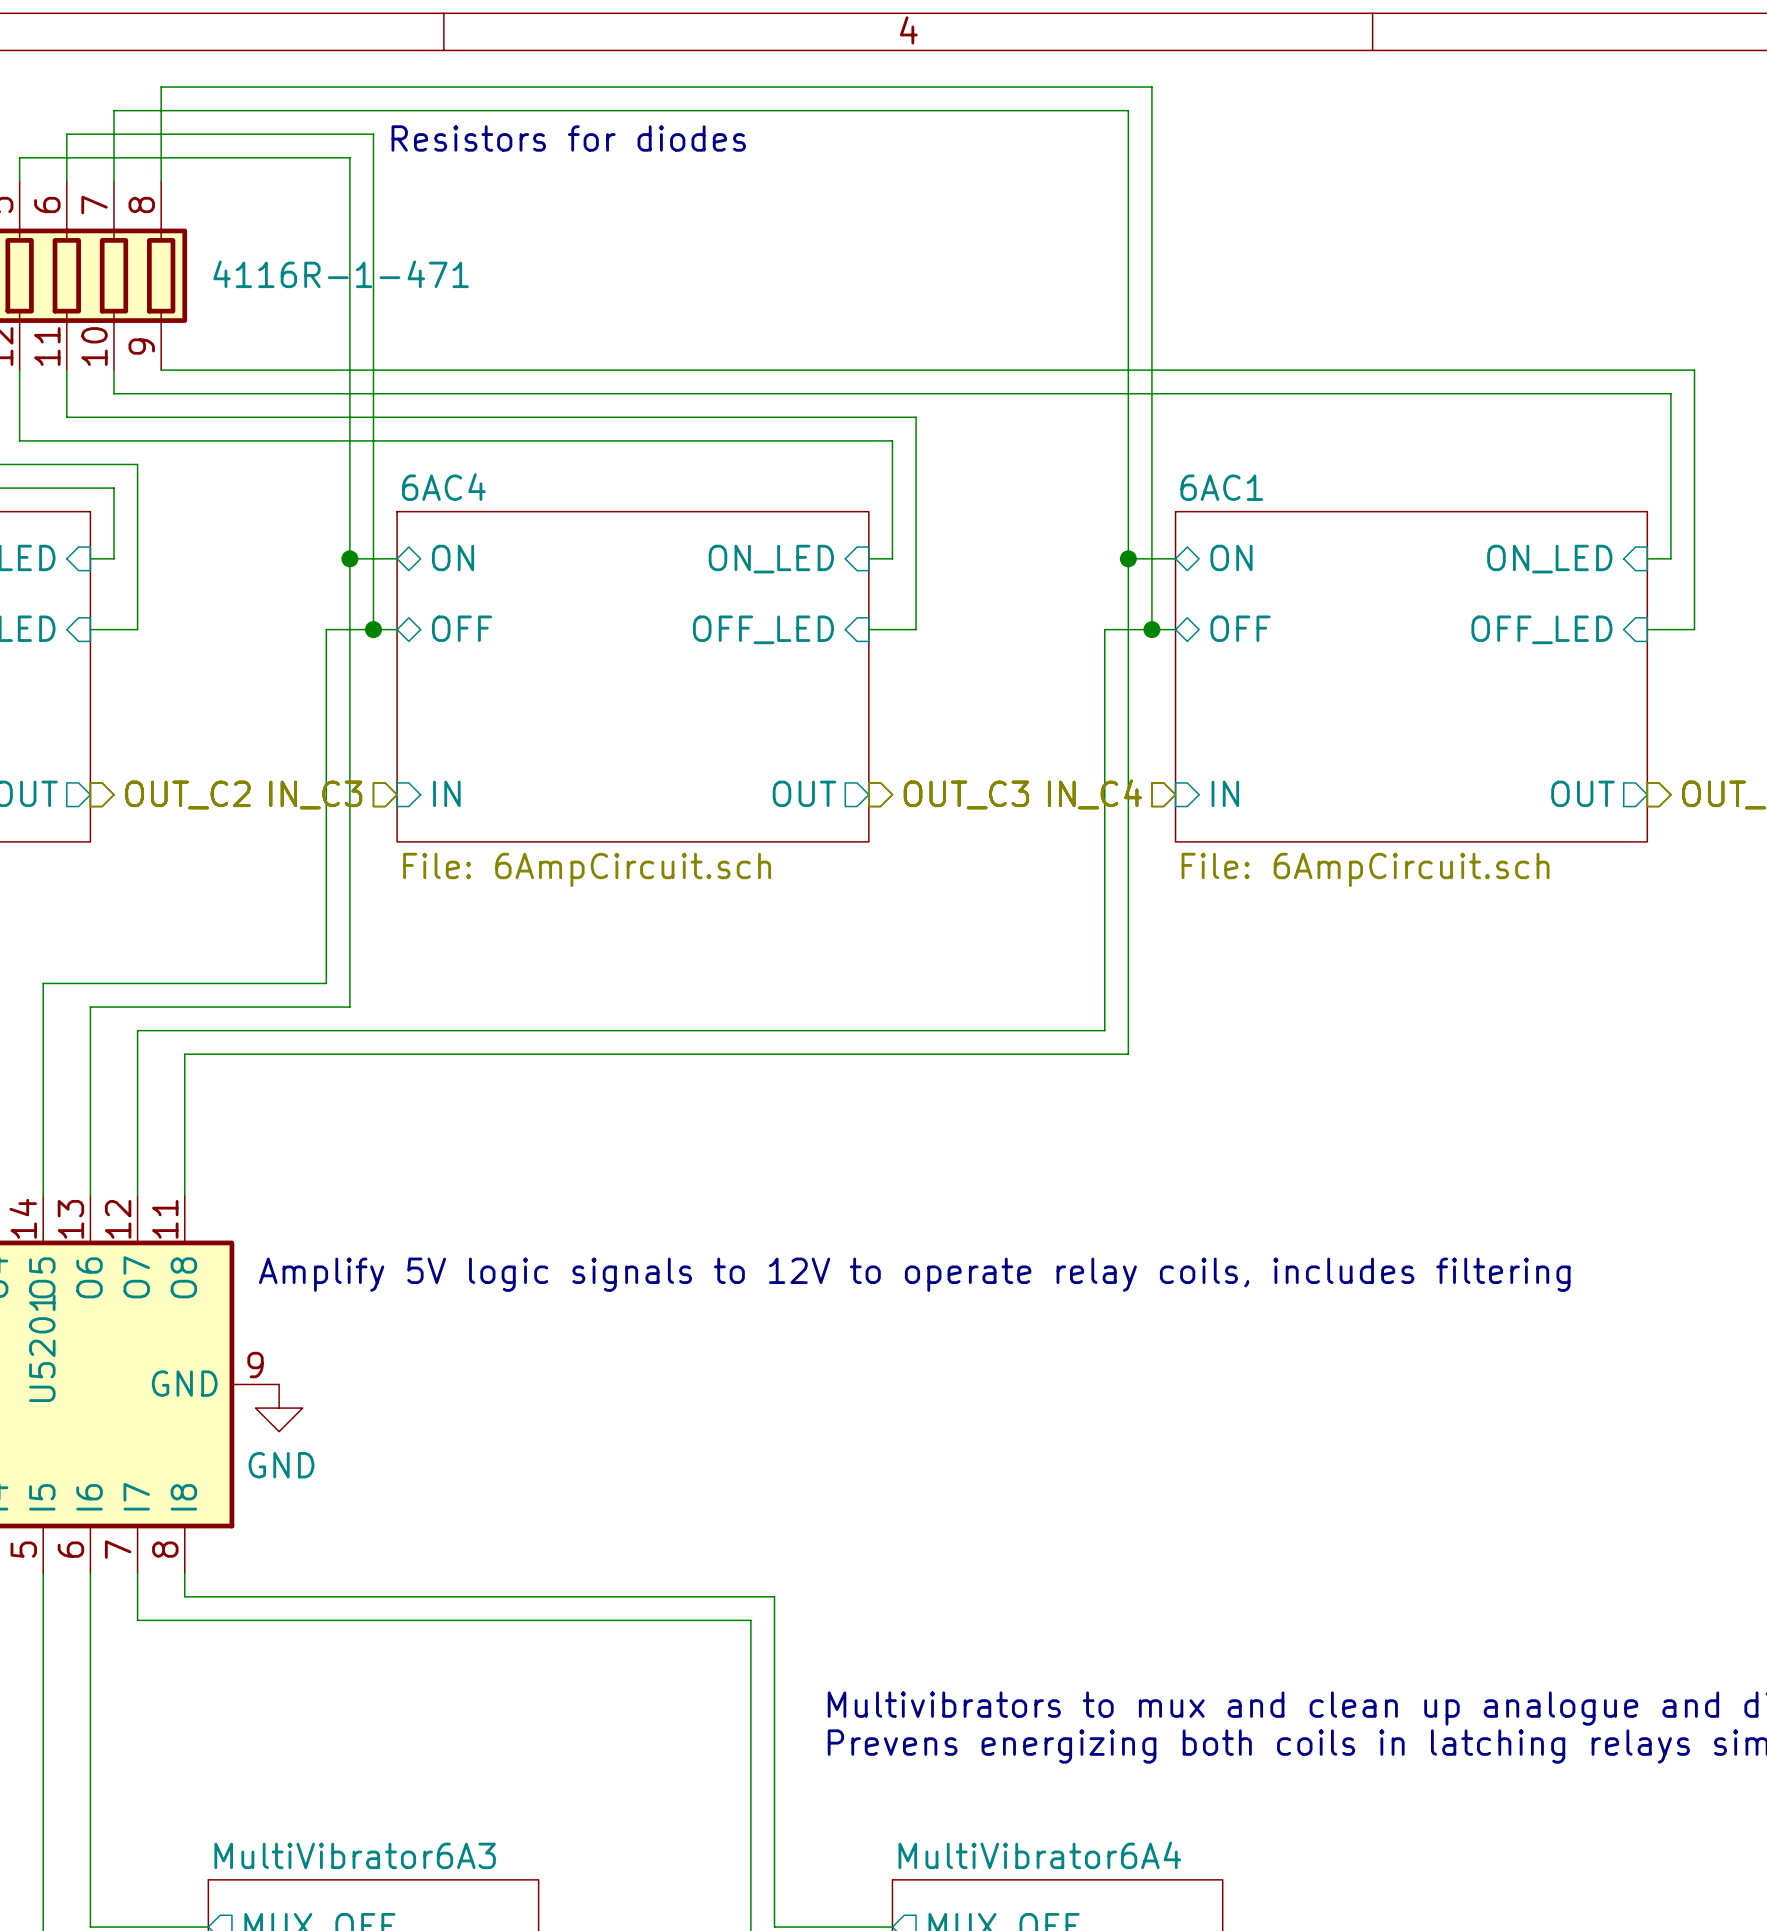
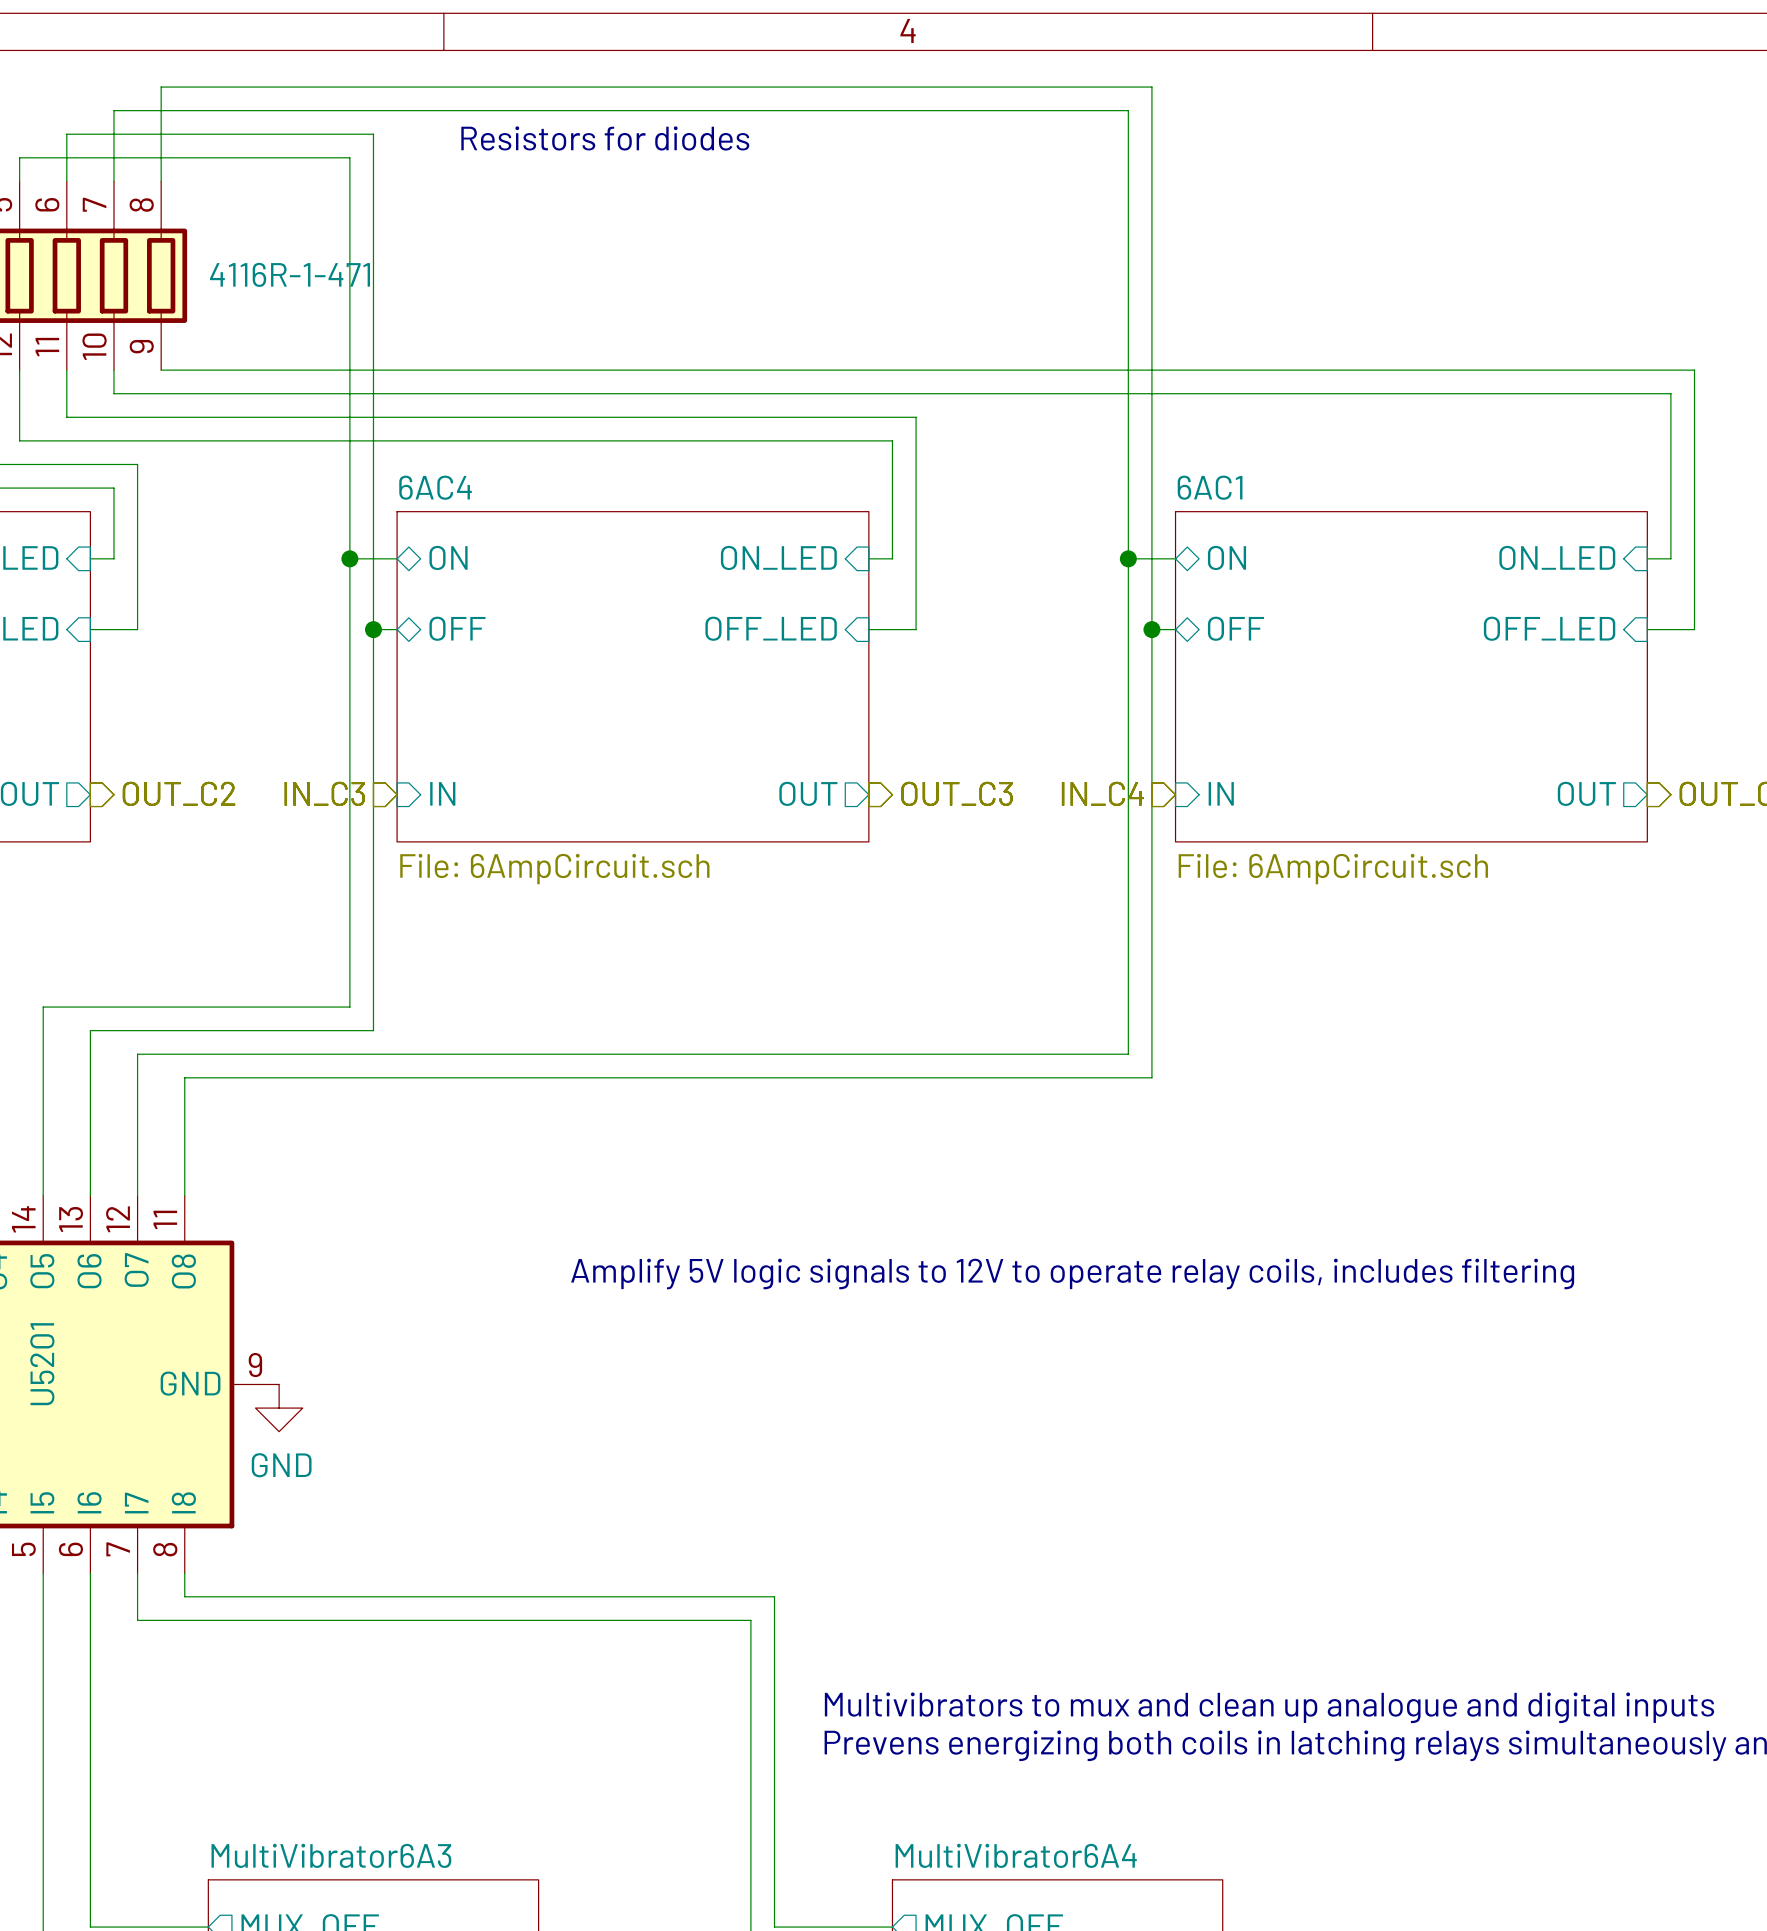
wire: (373, 629) (326, 629) (326, 983) (43, 983) (43, 1007) -> (373, 629) (373, 1030)
wire: (1151, 629) (1104, 629) (1104, 1030) (373, 1030) -> (1151, 629) (1151, 1077) (184, 1077)
wire: (90, 1007) (90, 1030) -> (90, 1007) (43, 1007)
wire: (137, 1030) (137, 1054) -> (137, 1030) (90, 1030)
wire: (184, 1054) (184, 1077) -> (184, 1054) (137, 1054)

